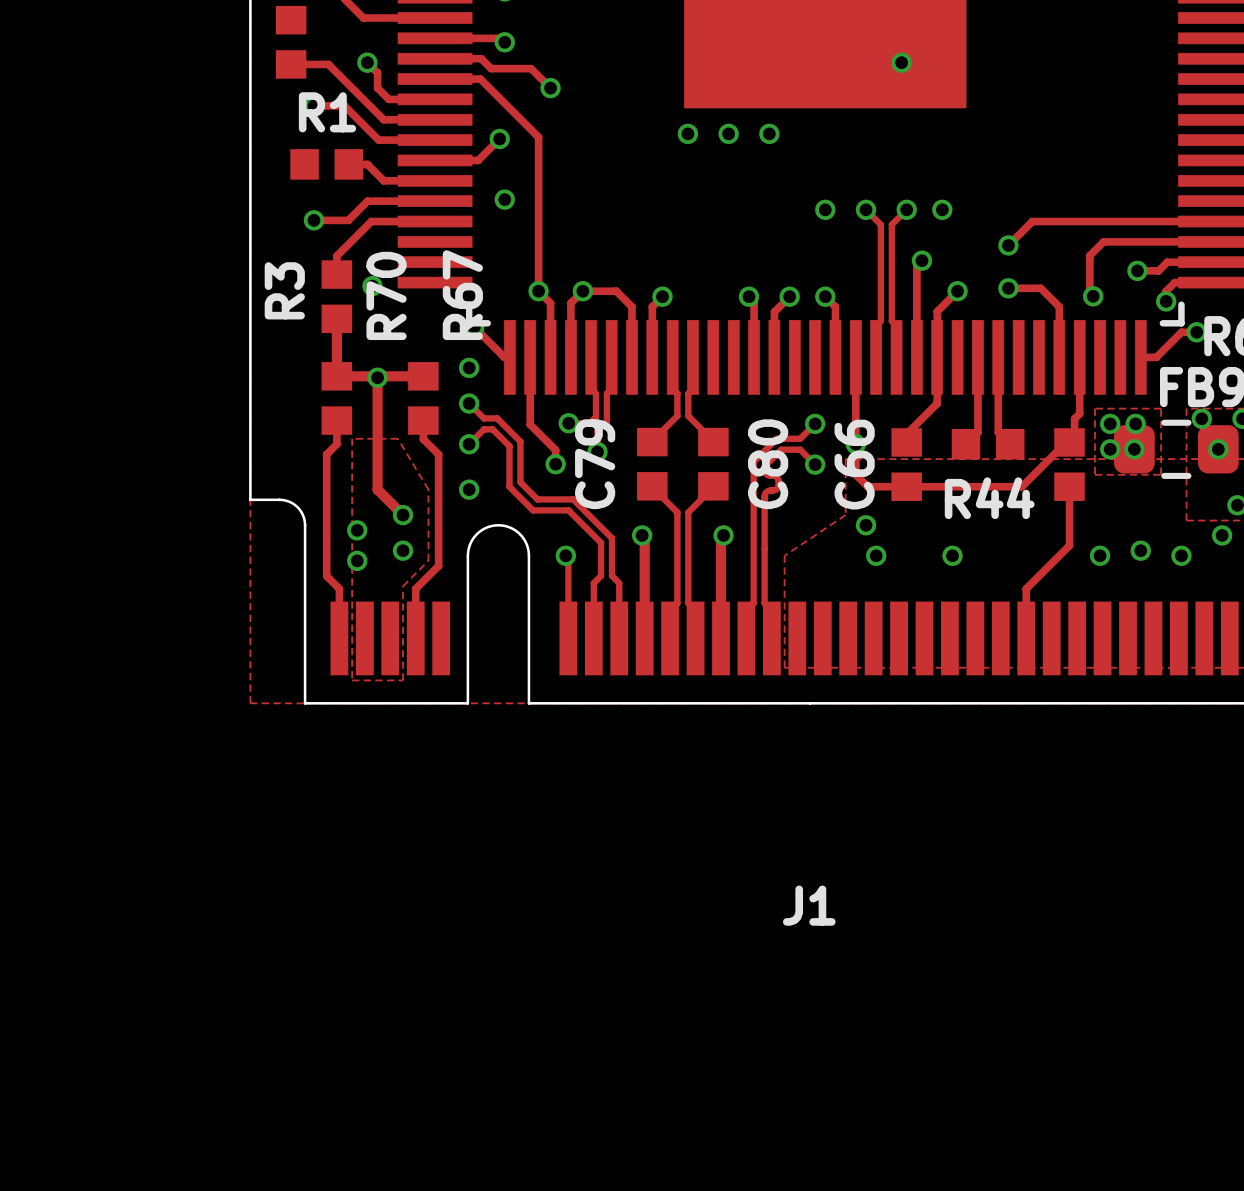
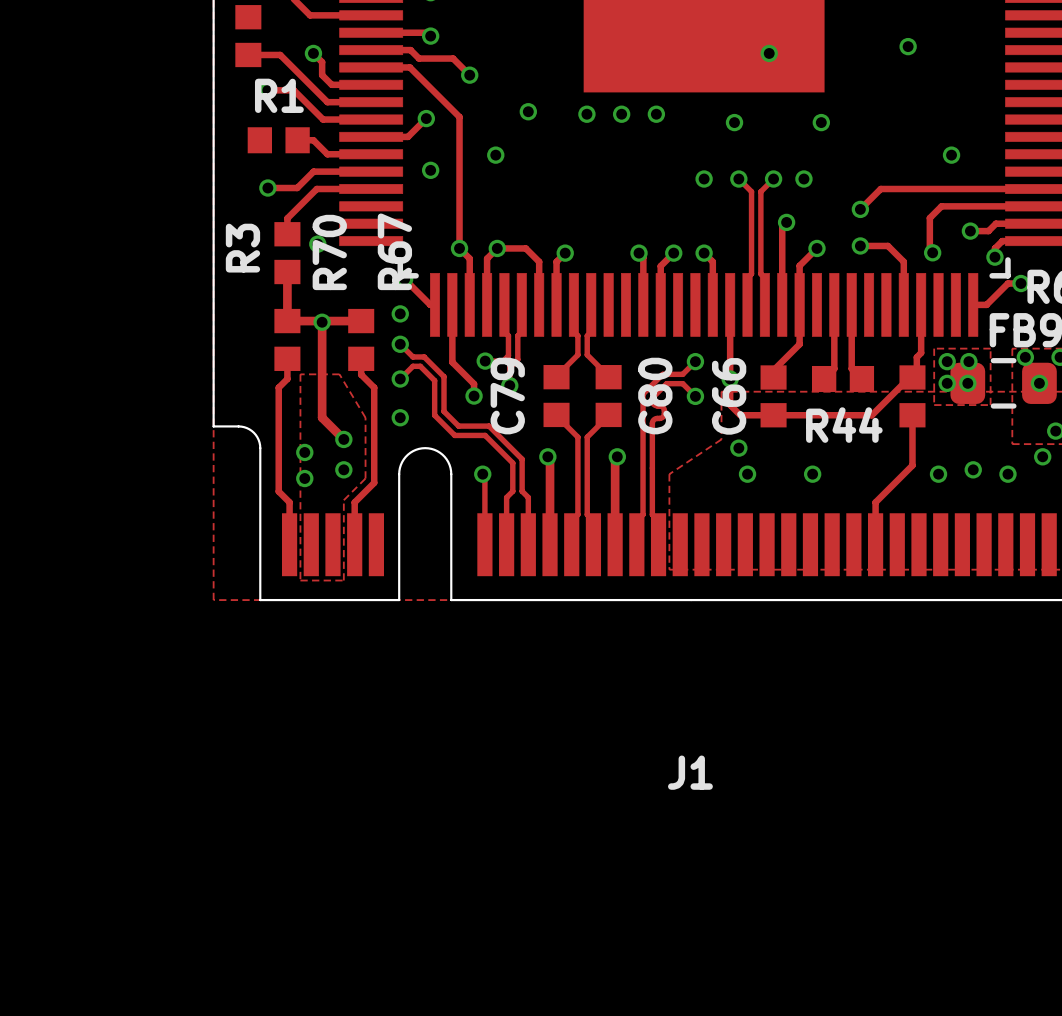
via: none -> (908, 46)
via: none -> (528, 111)
via: none -> (734, 122)
via: none -> (821, 122)
via: none -> (495, 155)
via: none -> (951, 155)

